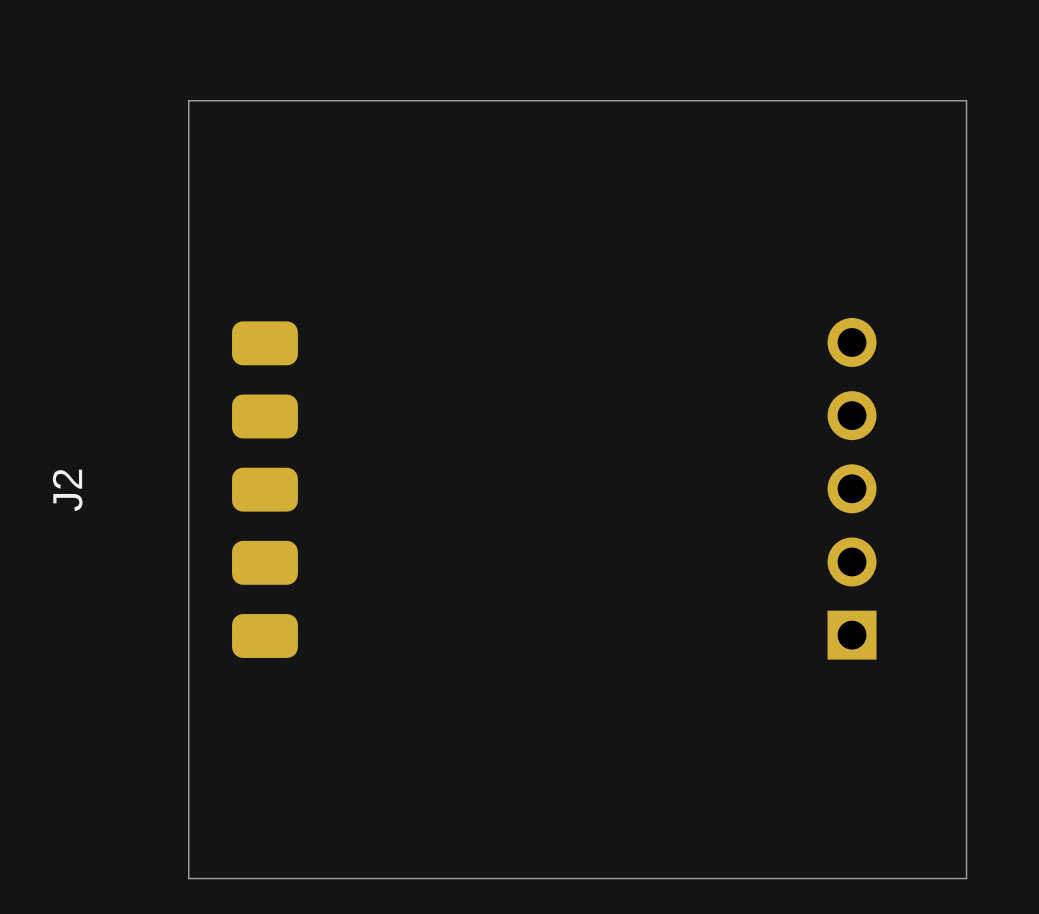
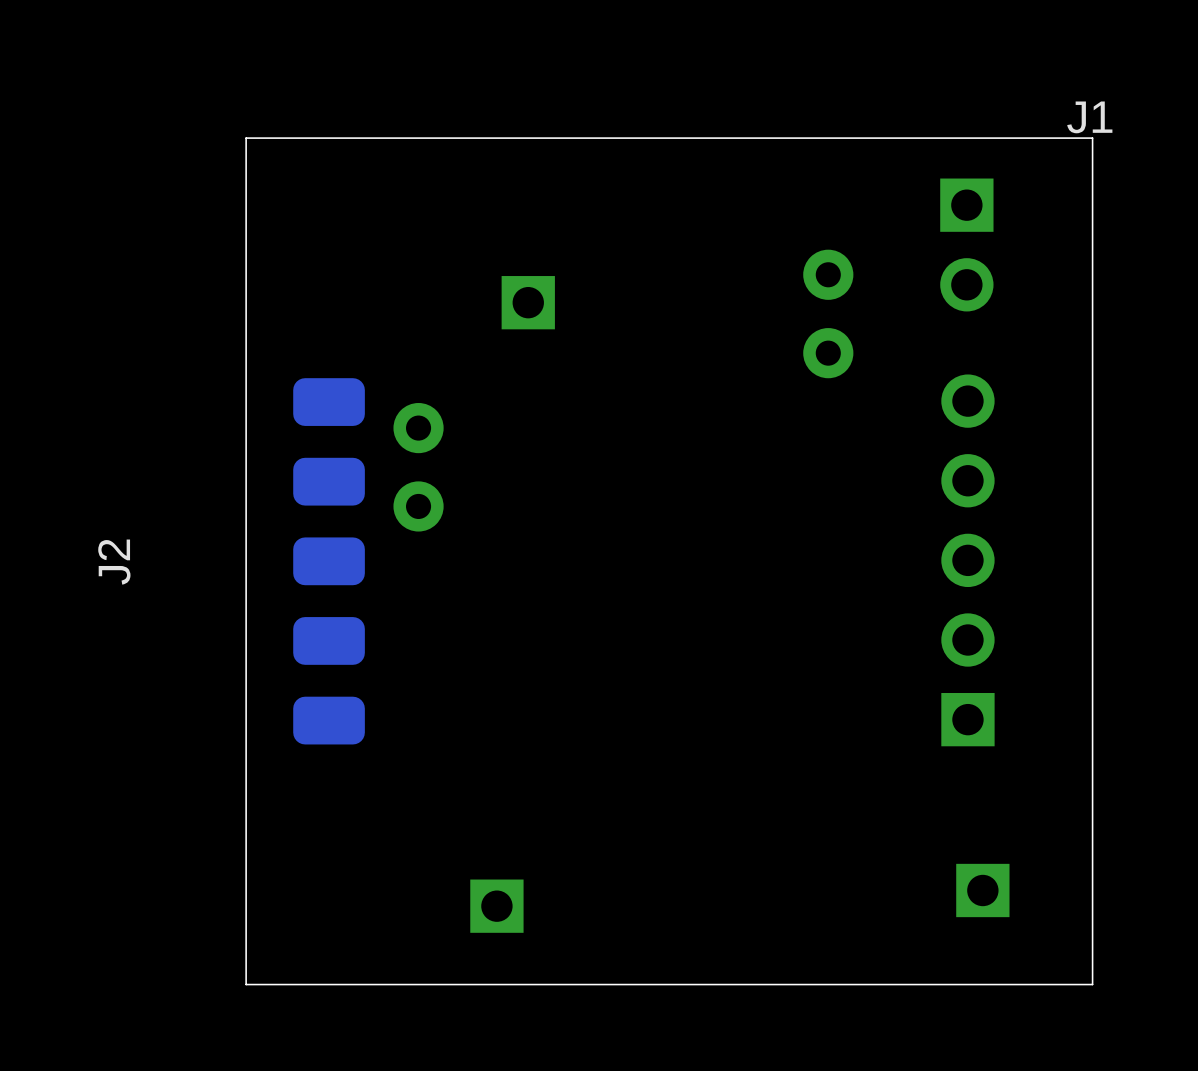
J1: none -> (966, 244)
part: none -> (528, 302)
part: none -> (828, 313)
part: none -> (418, 467)
part: none -> (982, 890)
part: none -> (496, 906)

